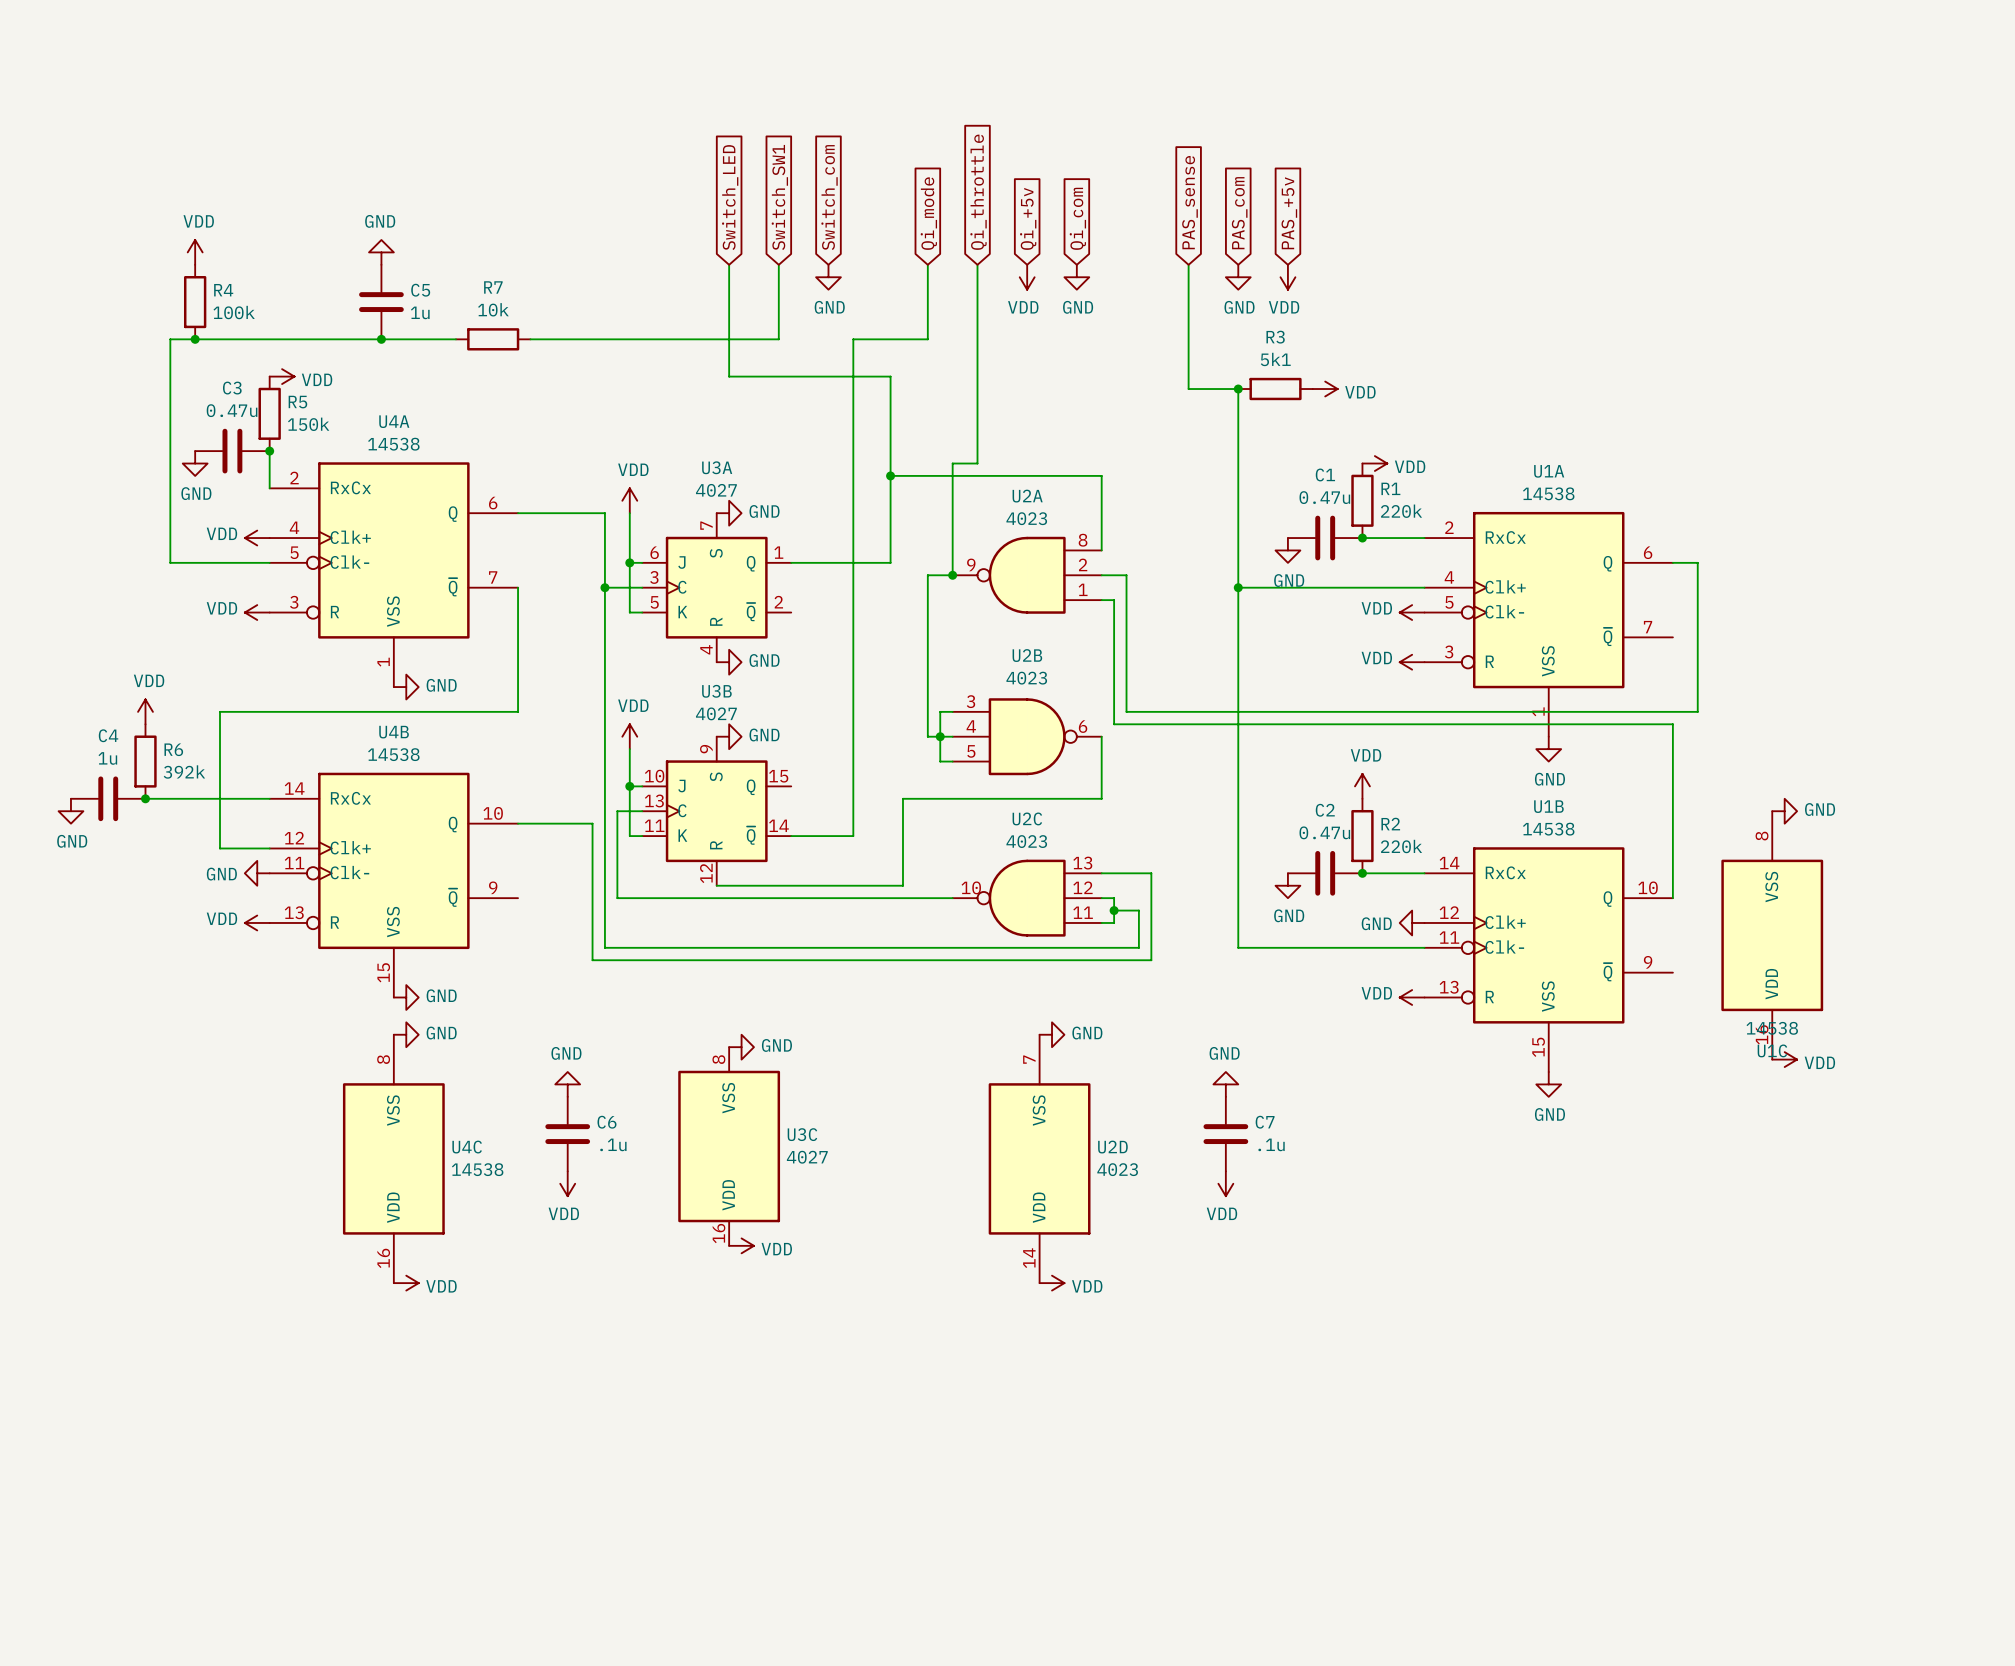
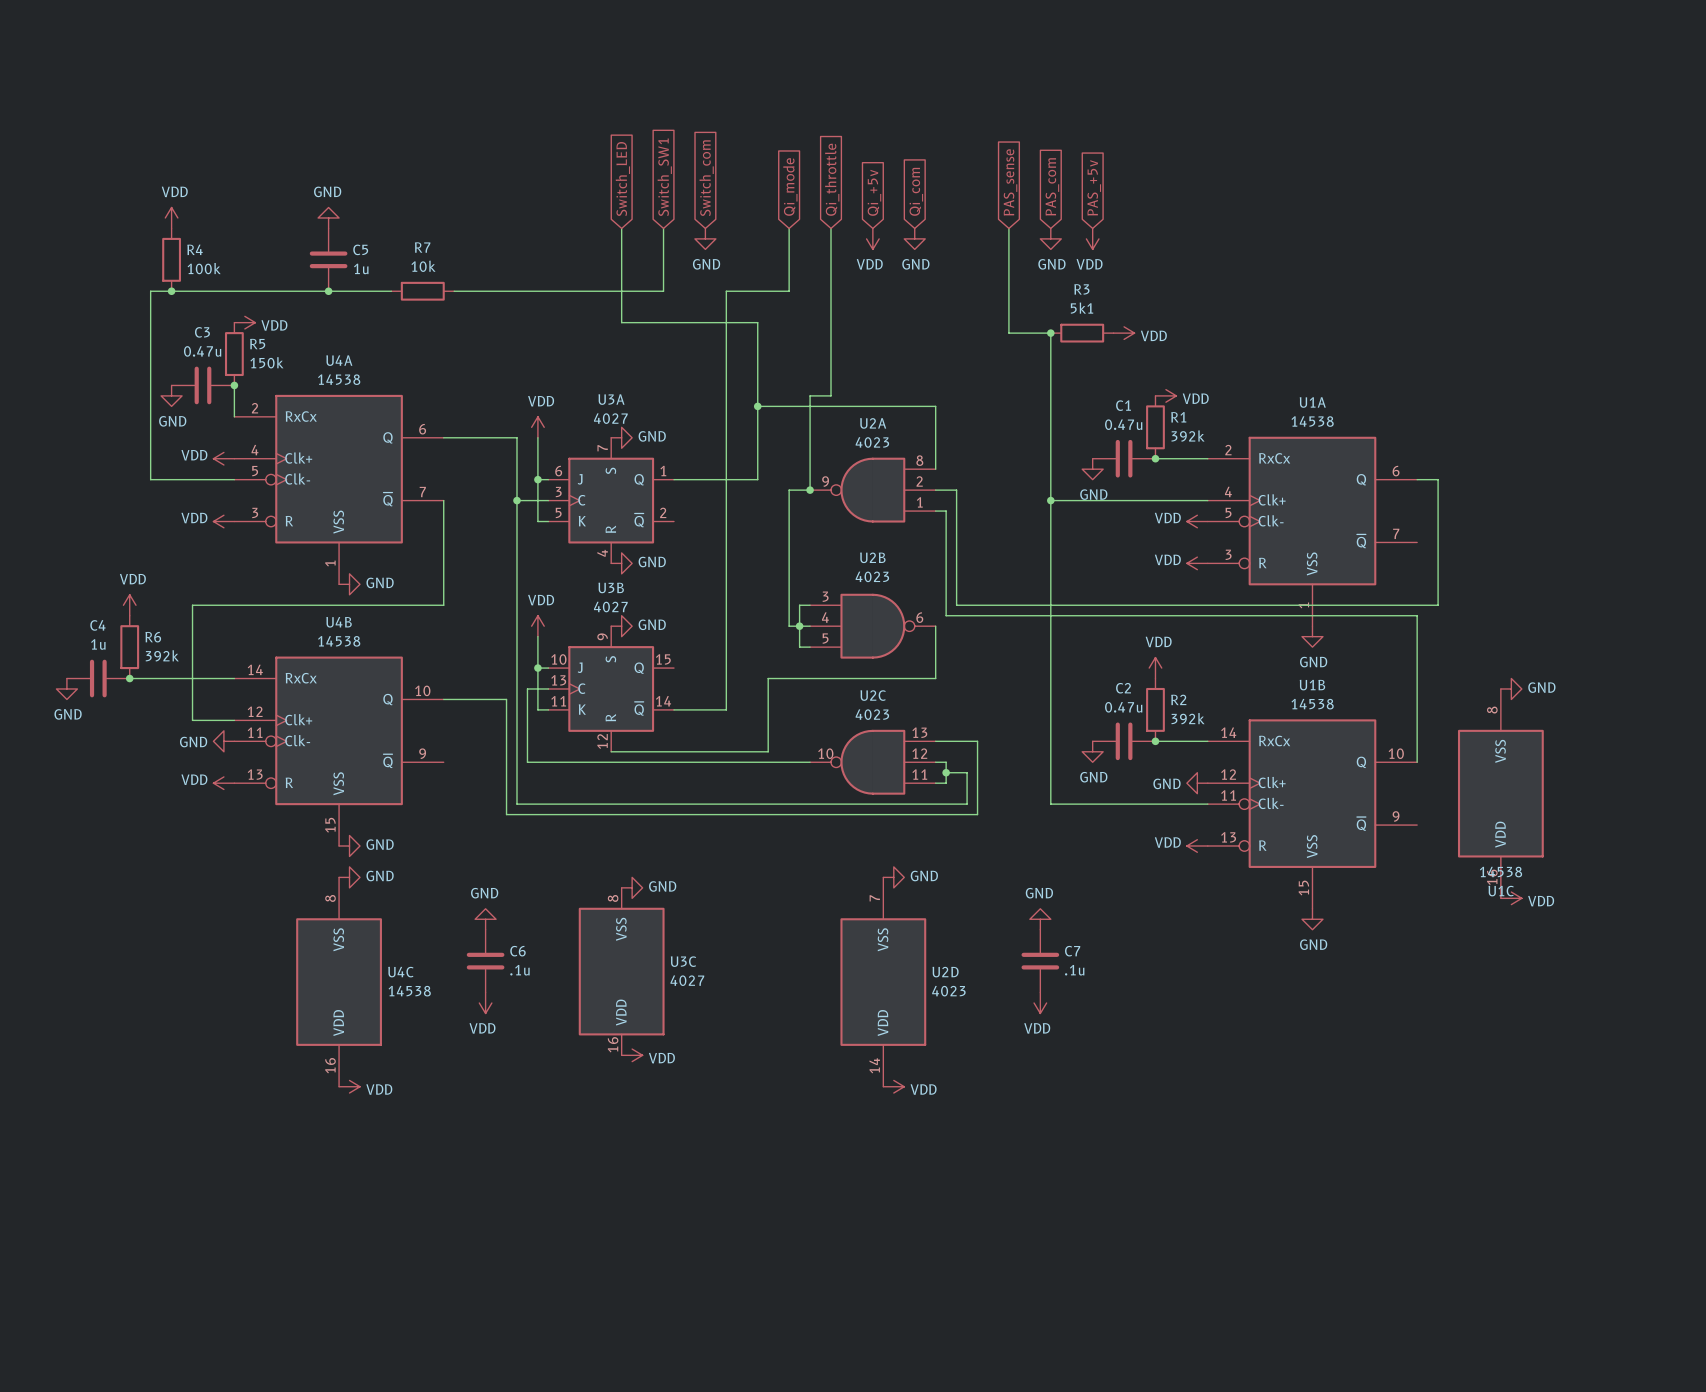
R1 value: 220k (1401, 511) -> 392k (1188, 436)
R2 value: 220k (1401, 846) -> 392k (1188, 718)

